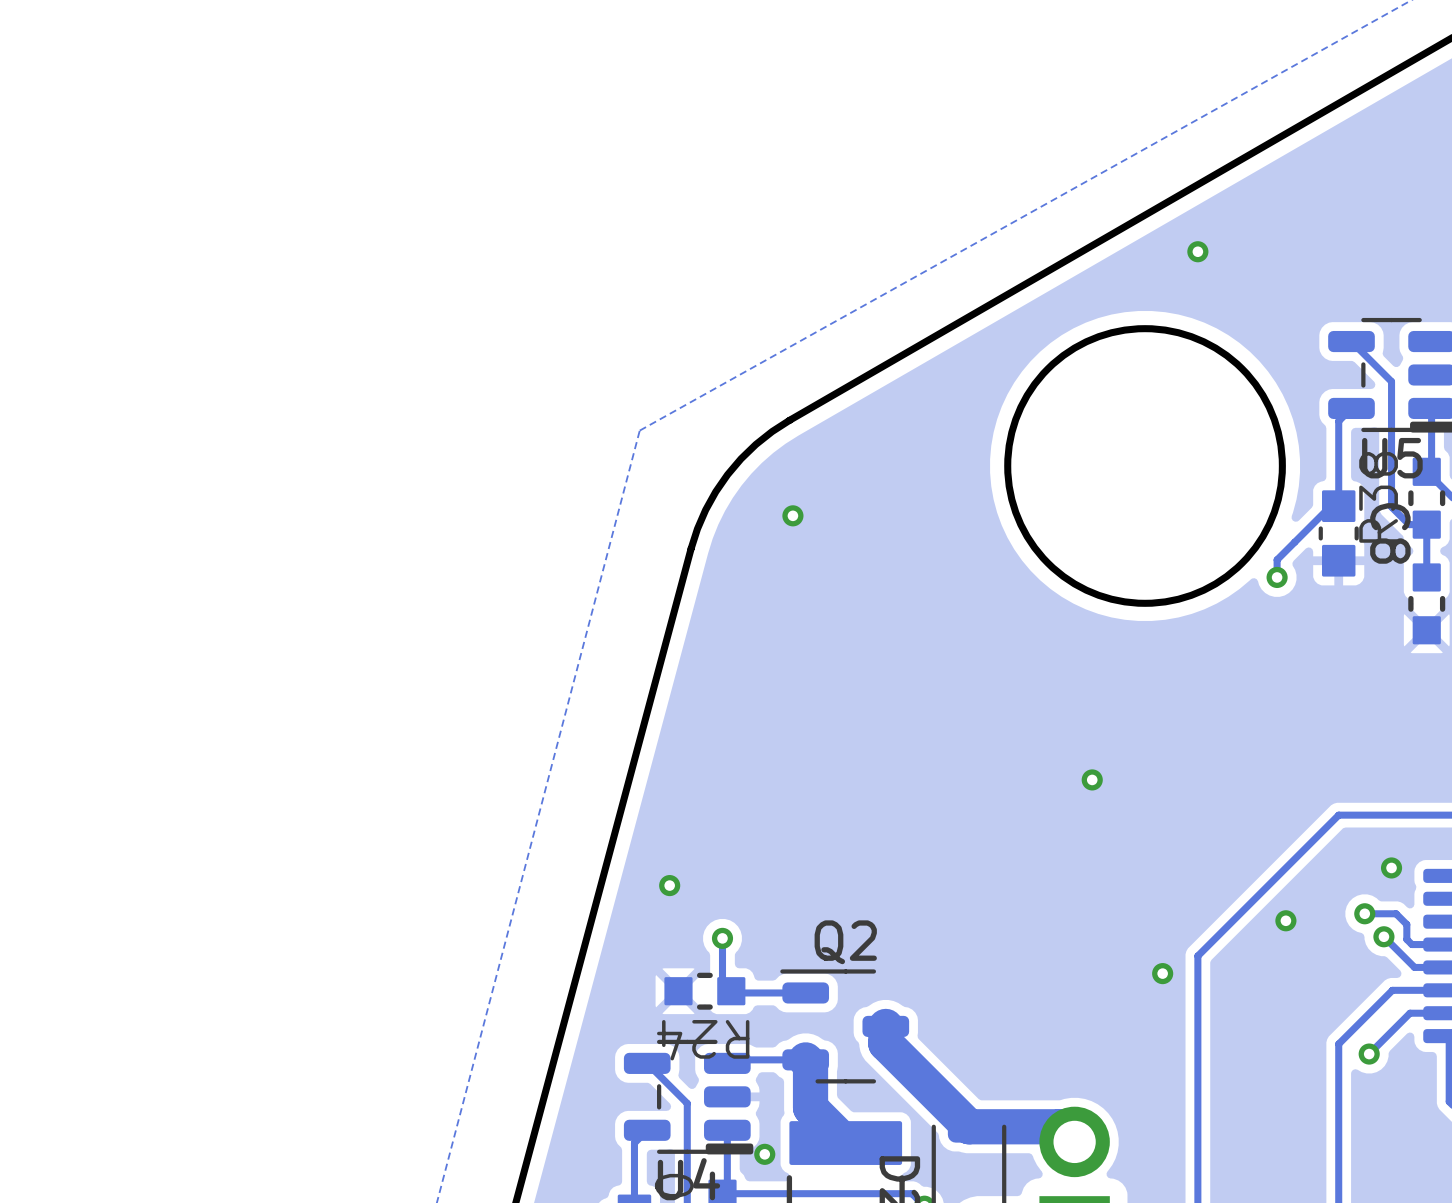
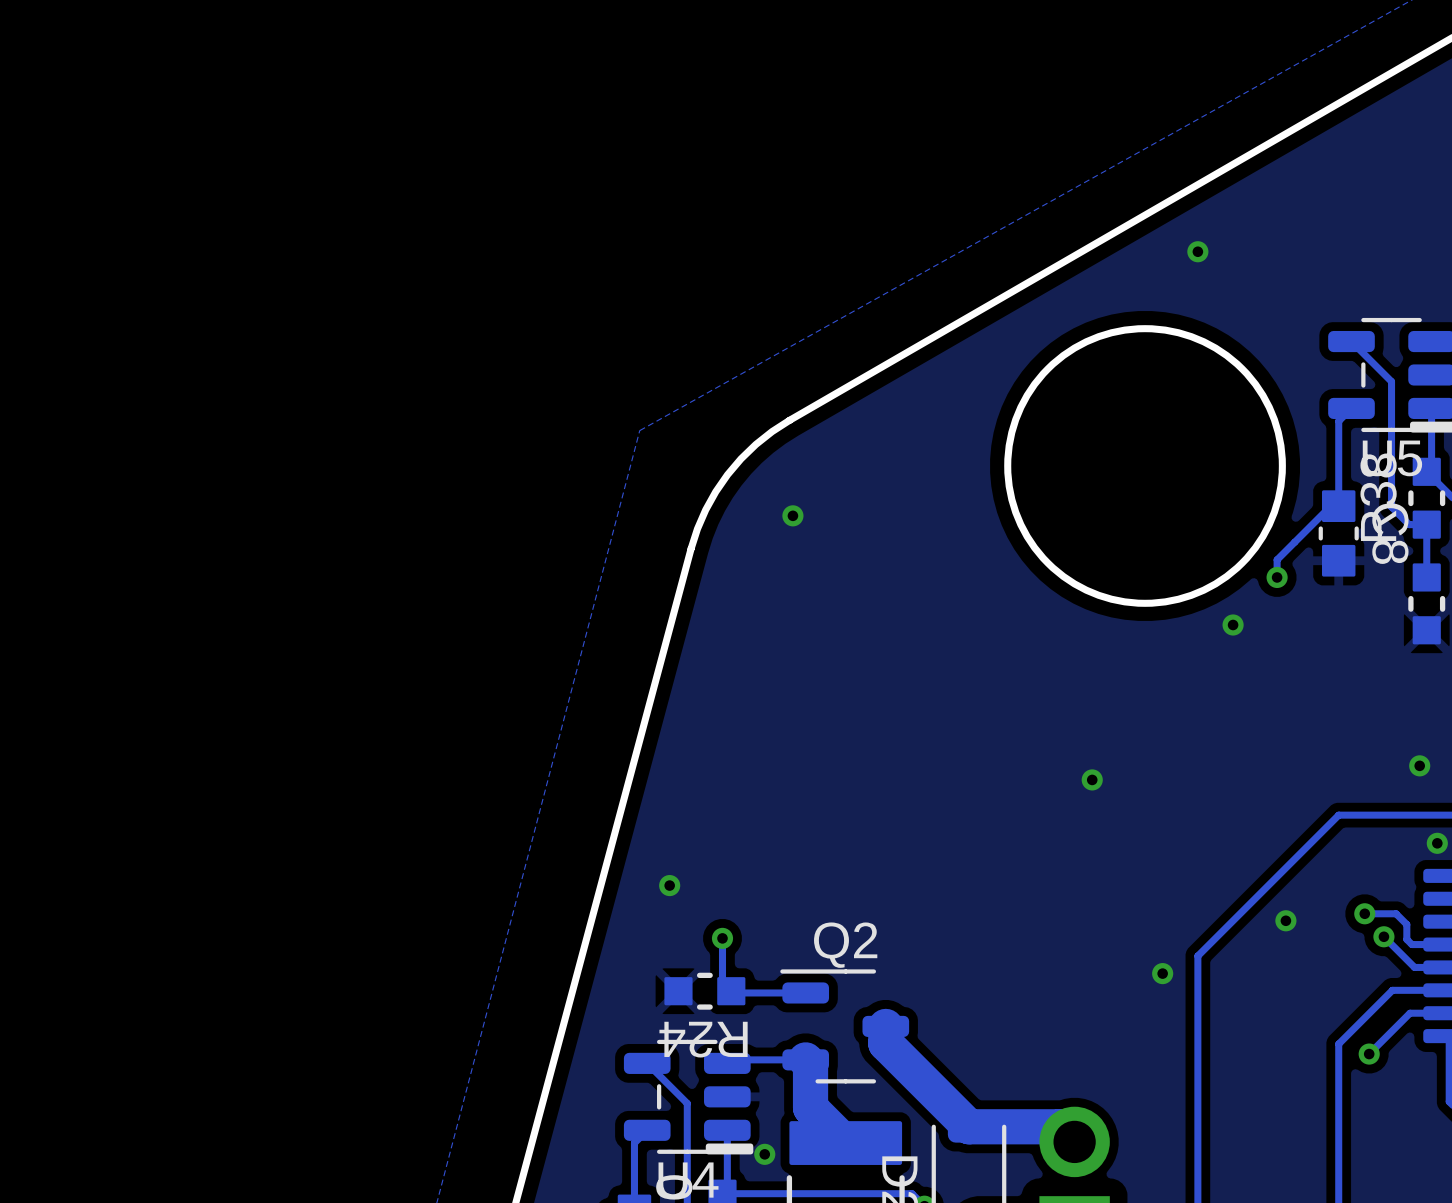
via: none -> (1233, 624)
via: none -> (1419, 765)
via position: (1391, 867) -> (1437, 843)

